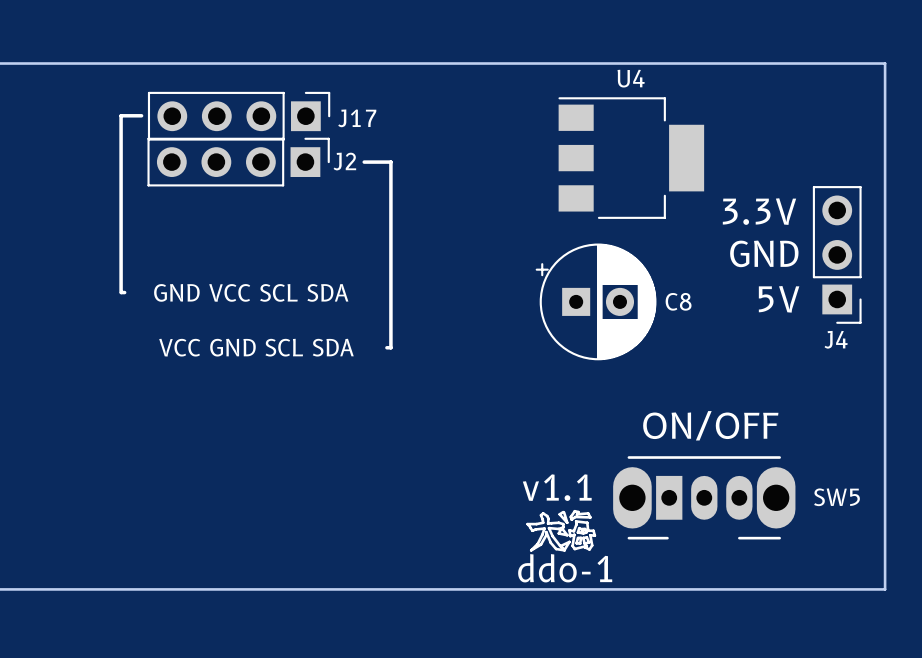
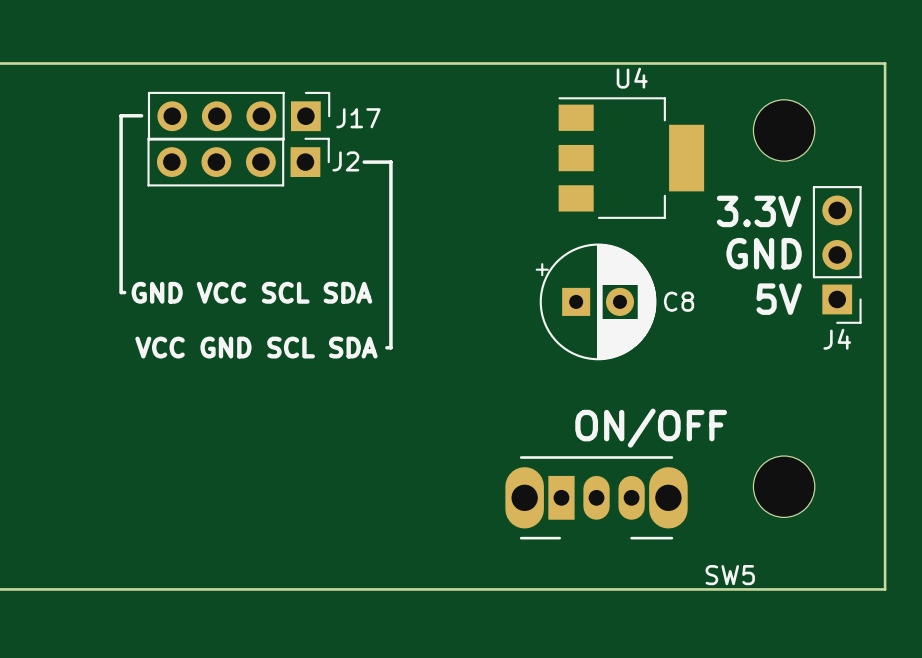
part: none -> (784, 130)
text position: ON/OFF (710, 425) -> ON/OFF (651, 428)
part: none -> (784, 486)
text: v1.1 (557, 487) -> none
SW5 position: (704, 497) -> (596, 497)
SW5 name position: SW5 (837, 497) -> SW5 (730, 575)
drawing: [526, 509, 597, 552] -> none
text: ddo-1 (565, 568) -> none

